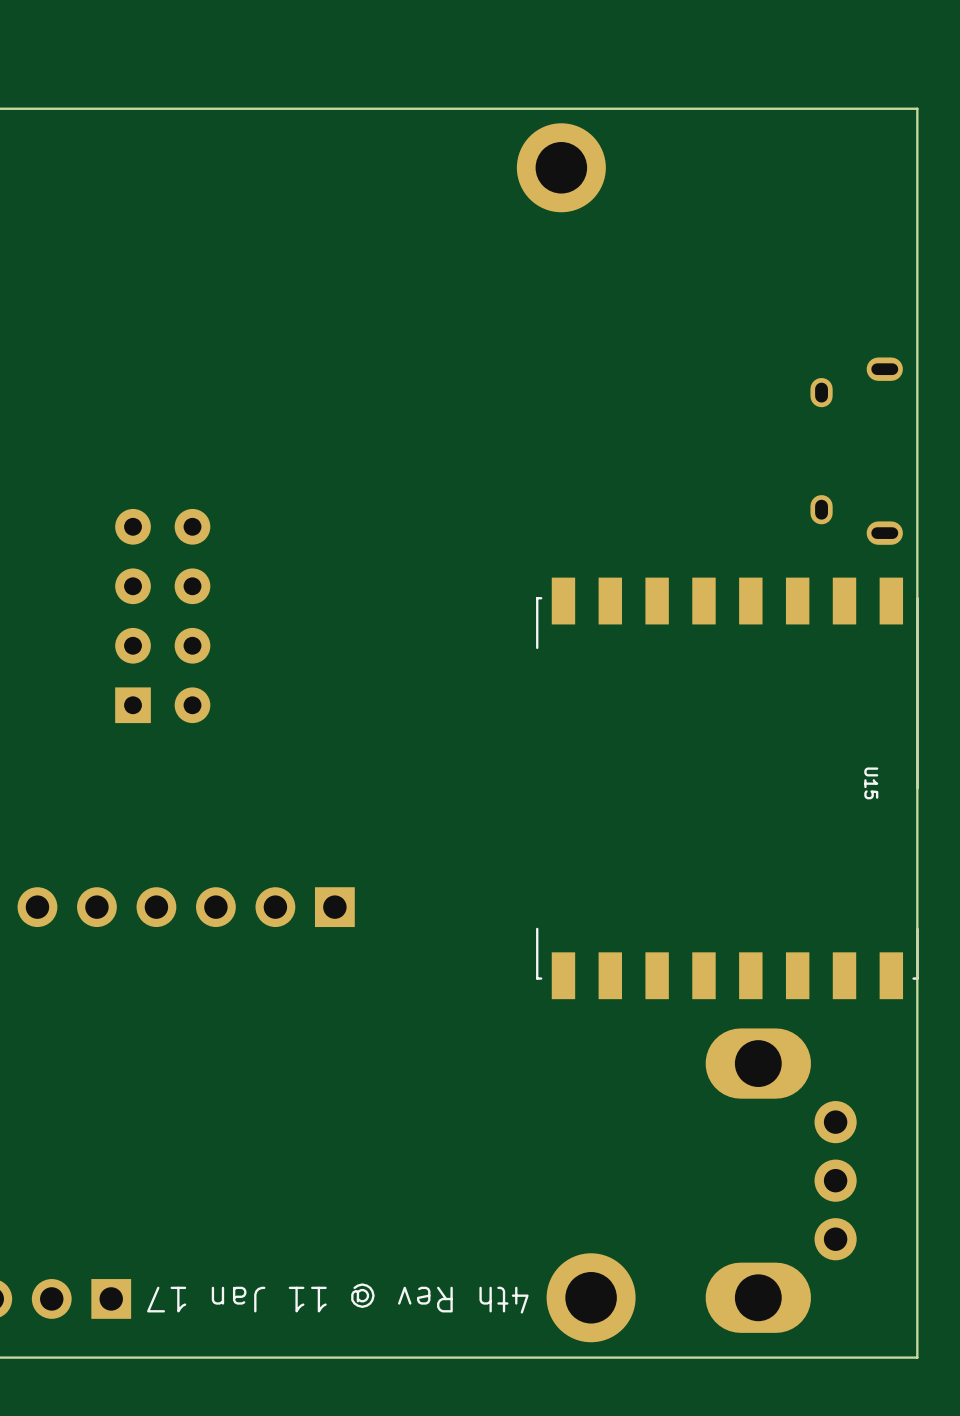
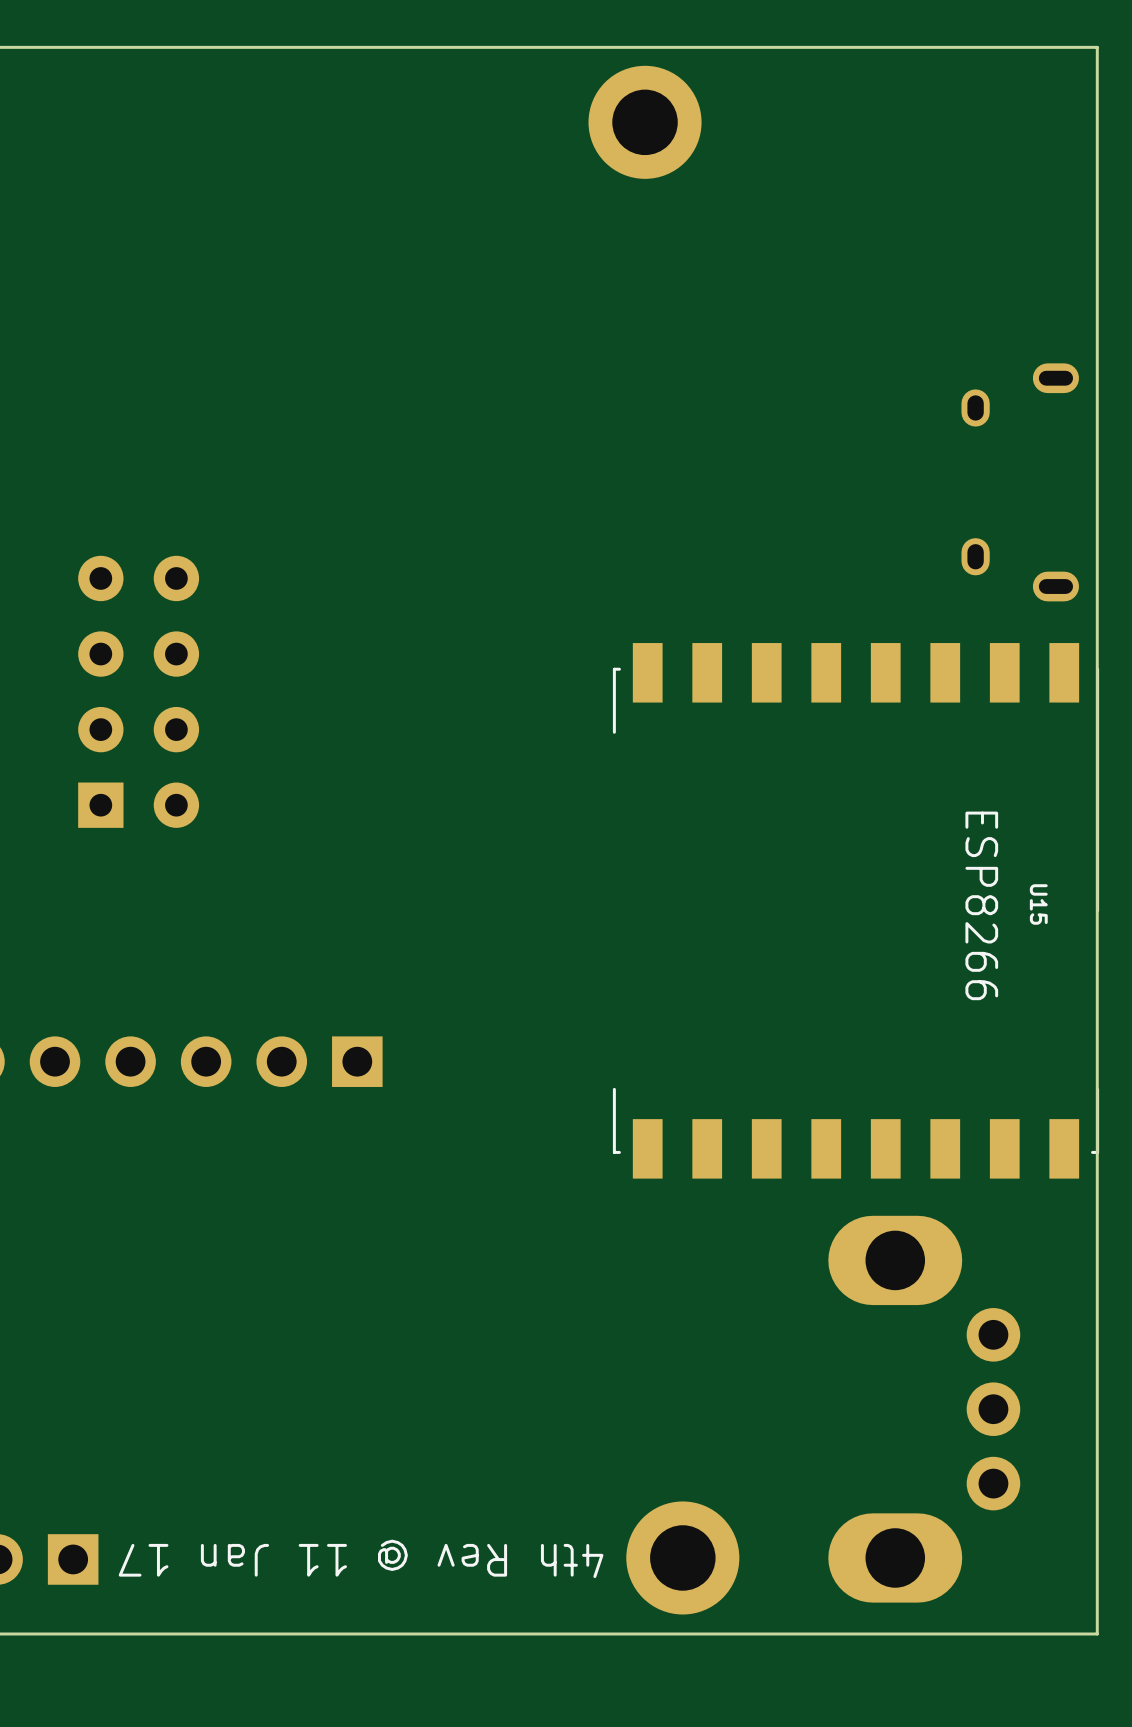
text: none -> ESP8266 (981, 905)

